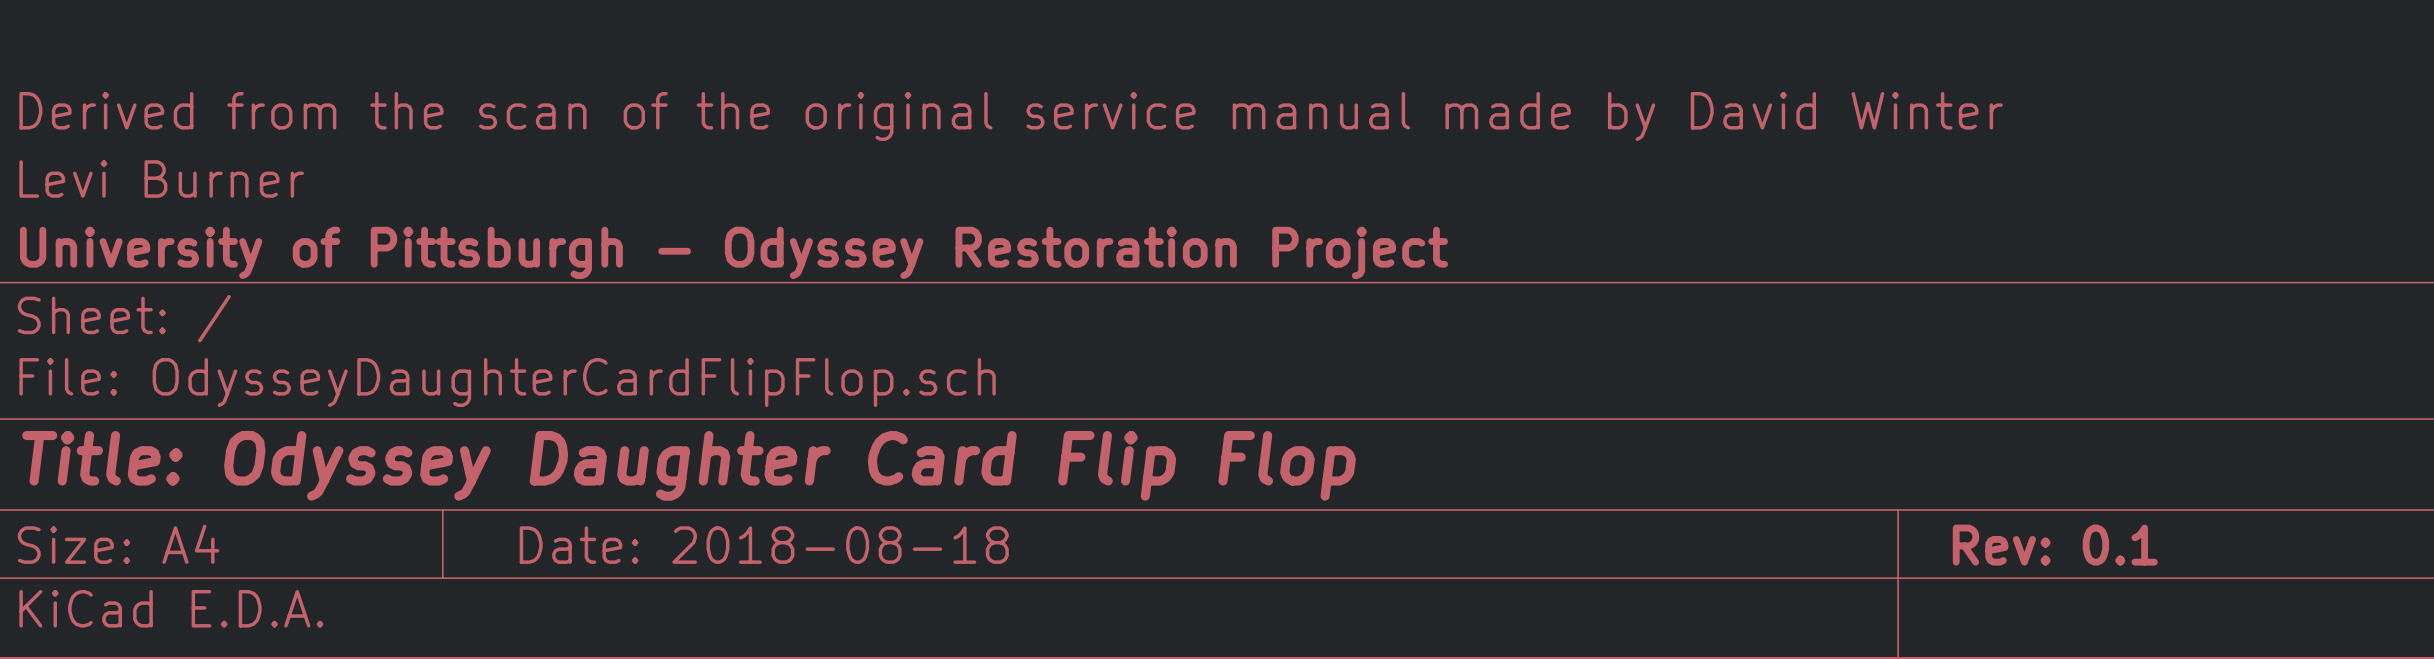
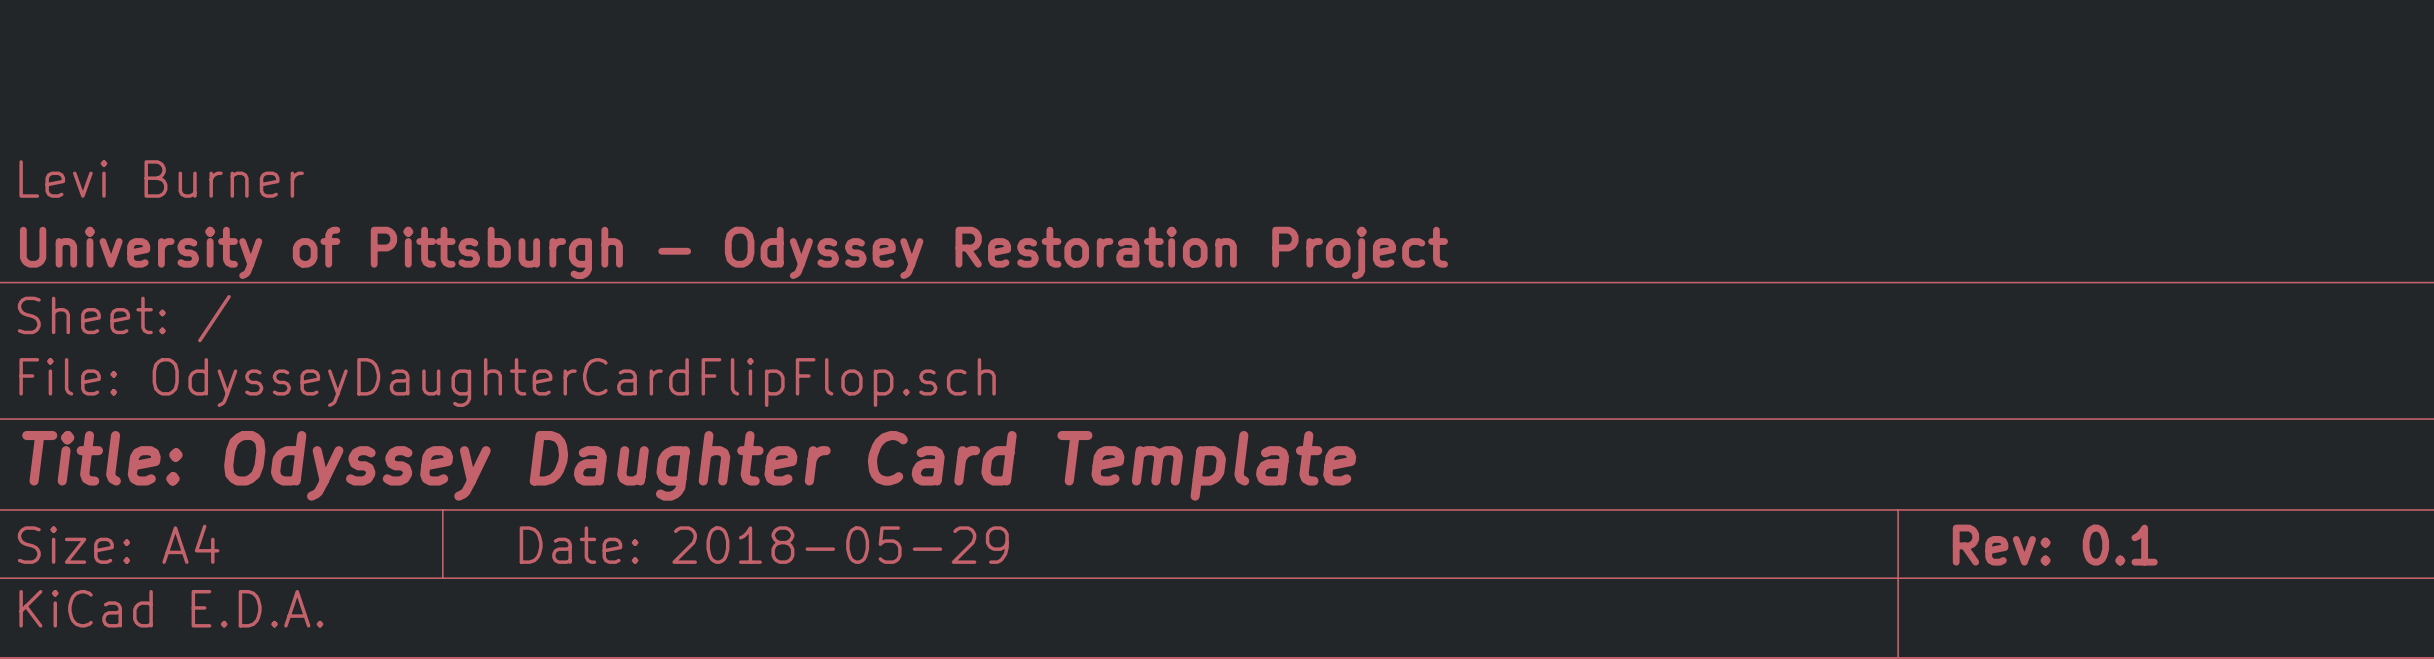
title block: Derived from the scan of the original service manual made by David Winter (1011, 116) -> none
title block: Title: Odyssey Daughter Card Flip Flop (689, 465) -> Title: Odyssey Daughter Card Template (689, 465)
title block: Date: 2018-08-18 (764, 545) -> Date: 2018-05-29 (764, 545)

